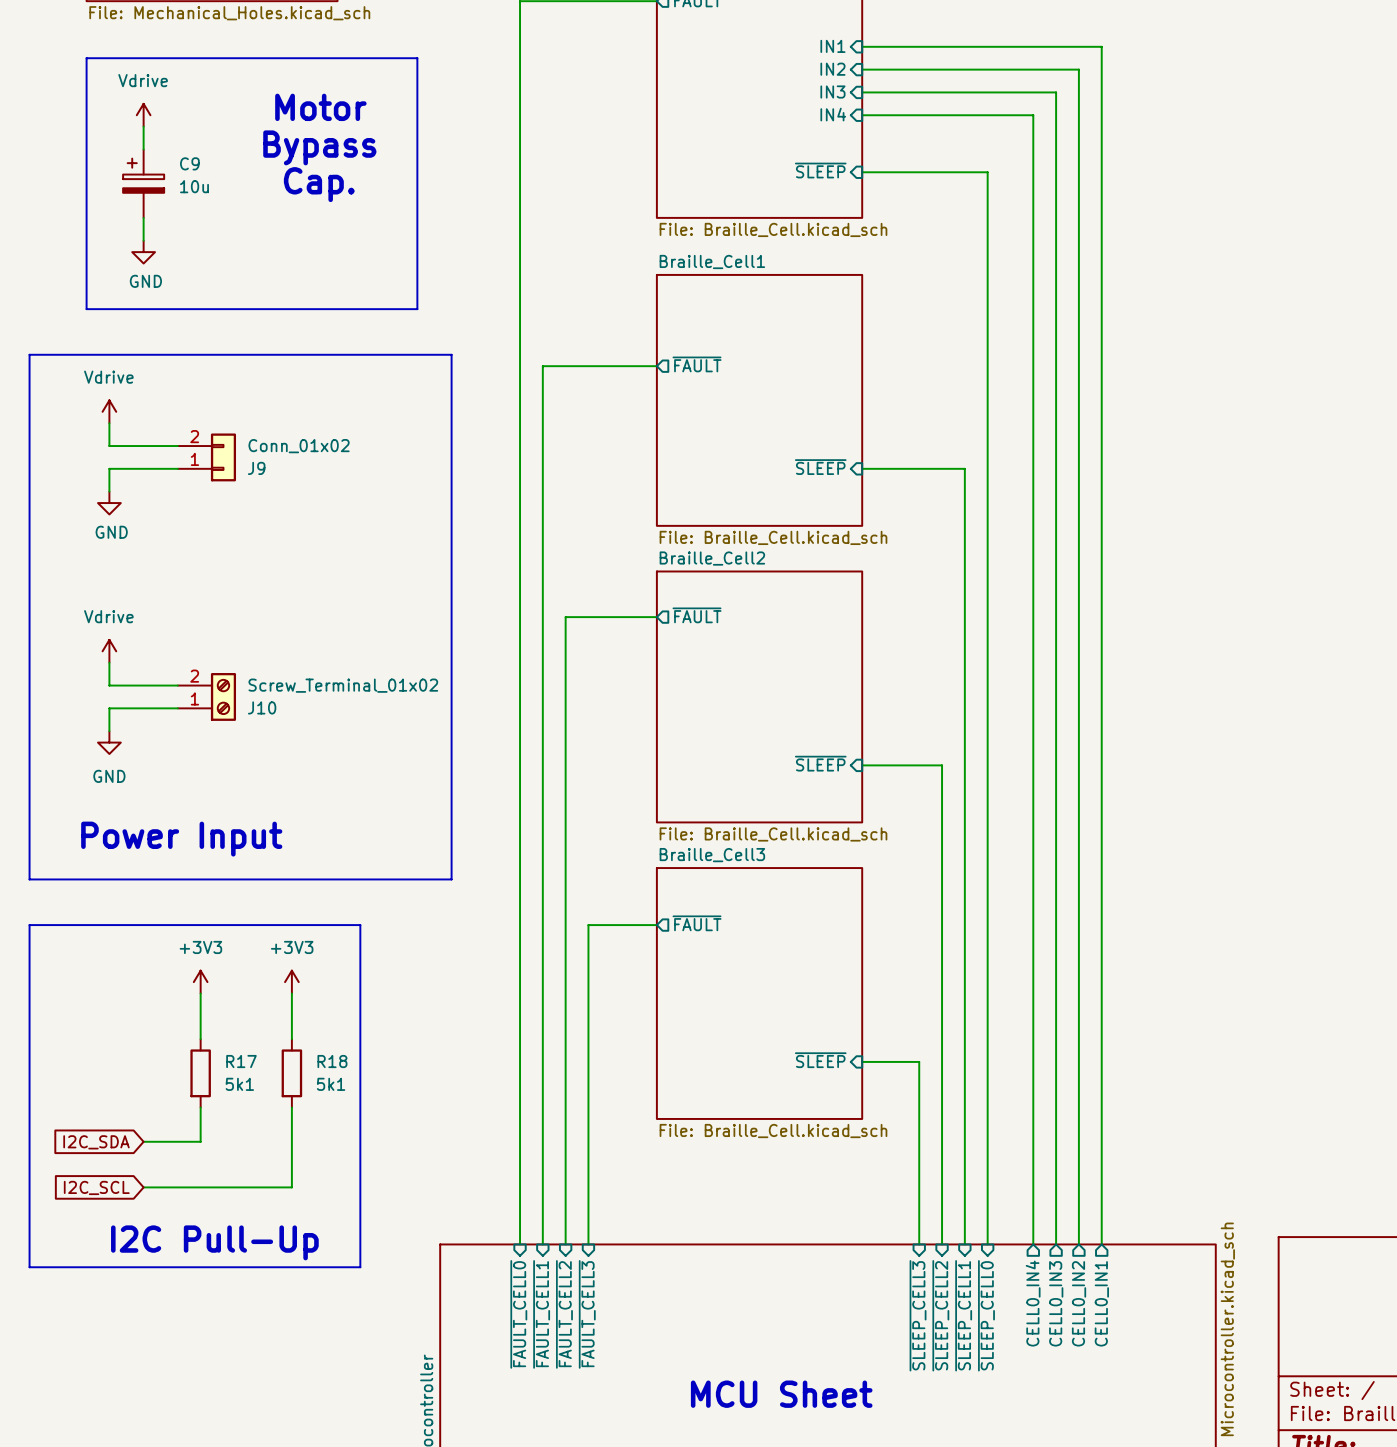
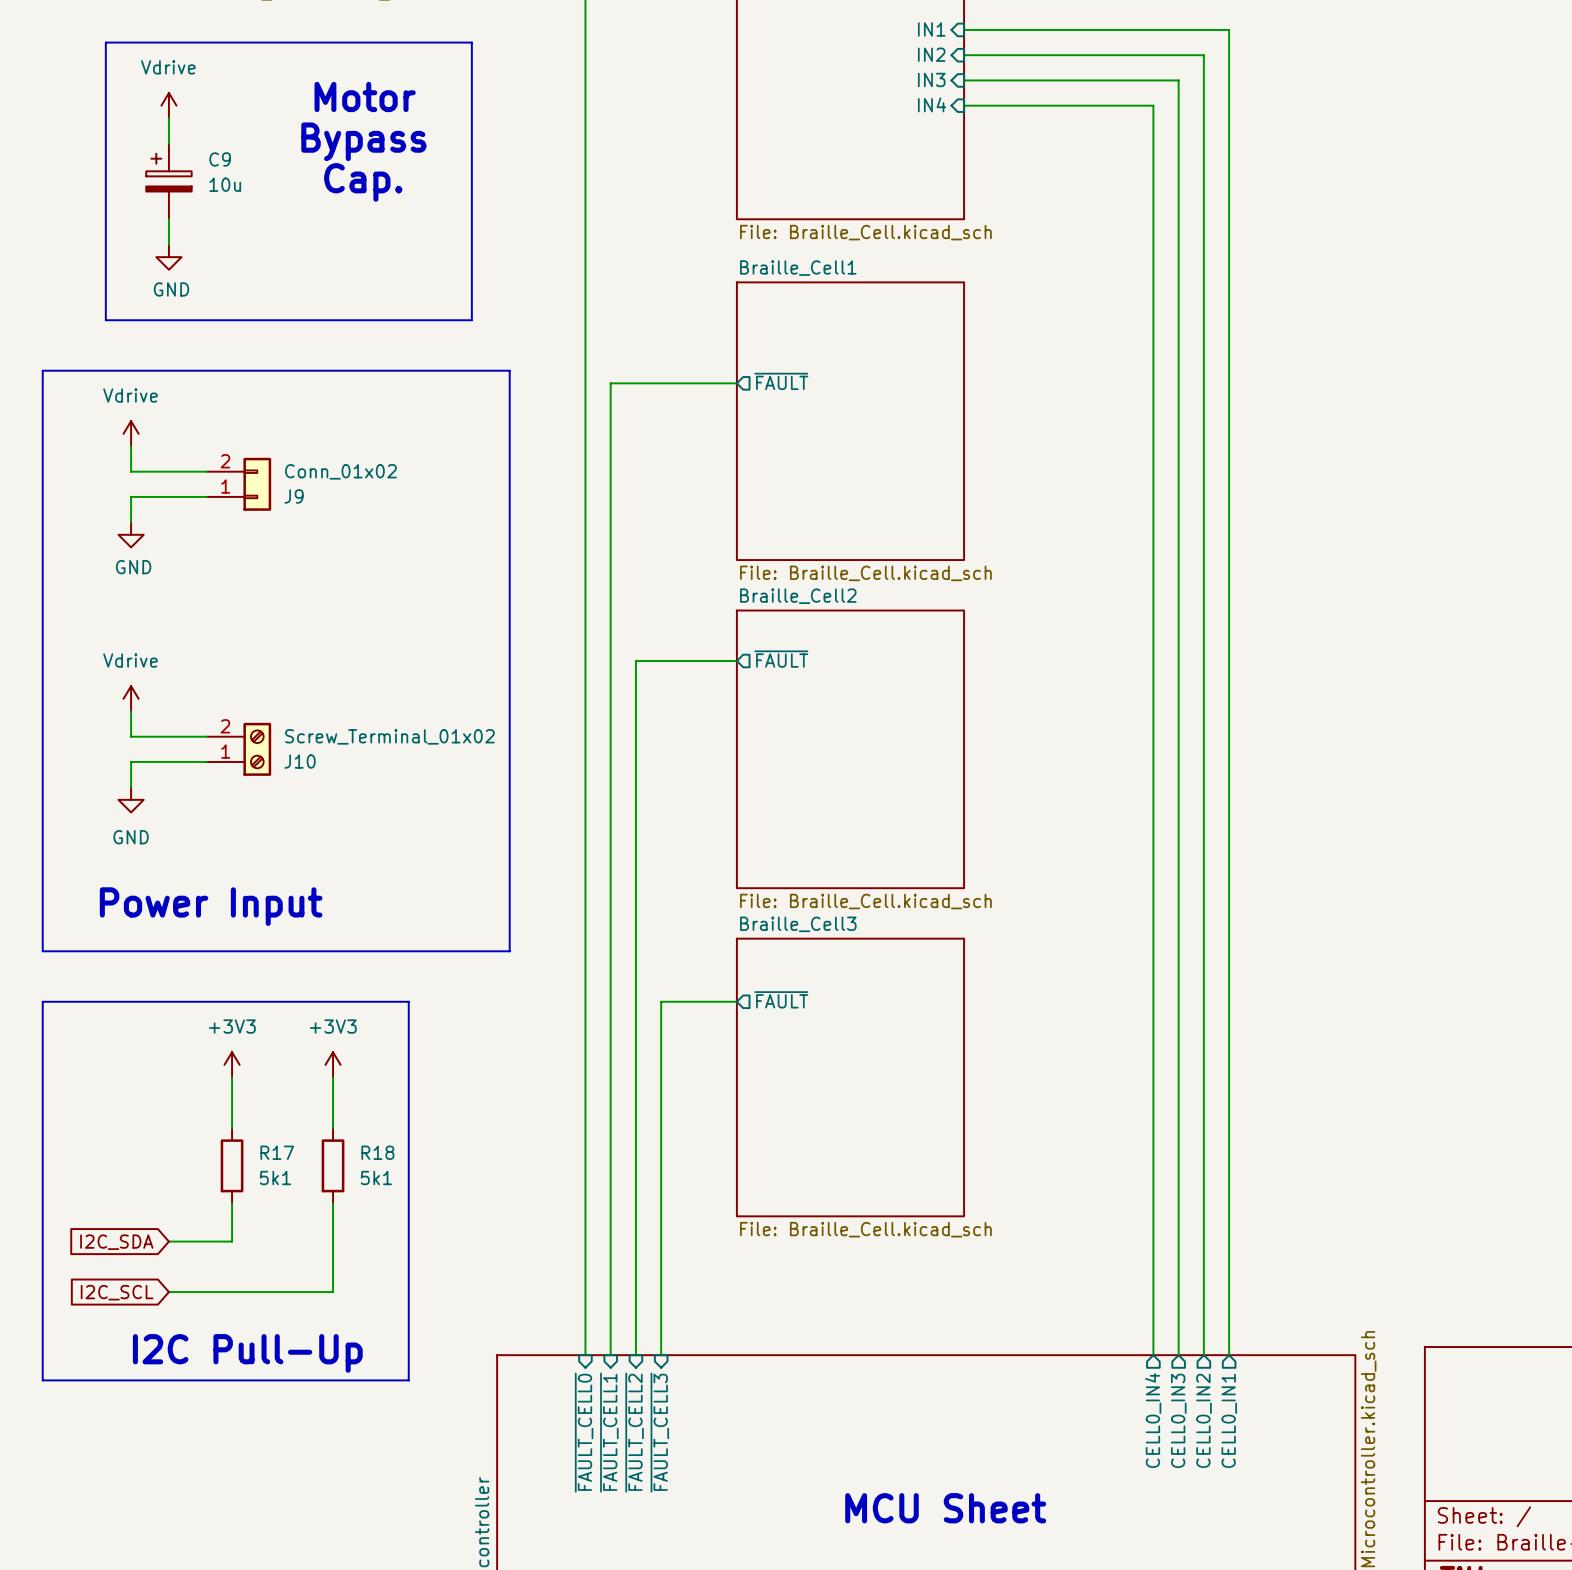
sheet pin: ~{SLEEP} (820, 170) -> none
wire: (862, 172) (987, 172) (987, 1244) -> none
sheet pin: ~{SLEEP} (820, 467) -> none
wire: (862, 468) (964, 468) (964, 1244) -> none
sheet pin: ~{SLEEP} (820, 763) -> none
wire: (862, 765) (942, 765) (942, 1244) -> none
sheet pin: ~{SLEEP} (820, 1060) -> none
wire: (862, 1061) (919, 1061) (919, 1244) -> none
sheet pin: ~{SLEEP_CELL3} (918, 1315) -> none
sheet pin: ~{SLEEP_CELL2} (940, 1315) -> none
sheet pin: ~{SLEEP_CELL1} (963, 1315) -> none
sheet pin: ~{SLEEP_CELL0} (986, 1315) -> none
text position: MCU Sheet (781, 1394) -> MCU Sheet (945, 1508)

